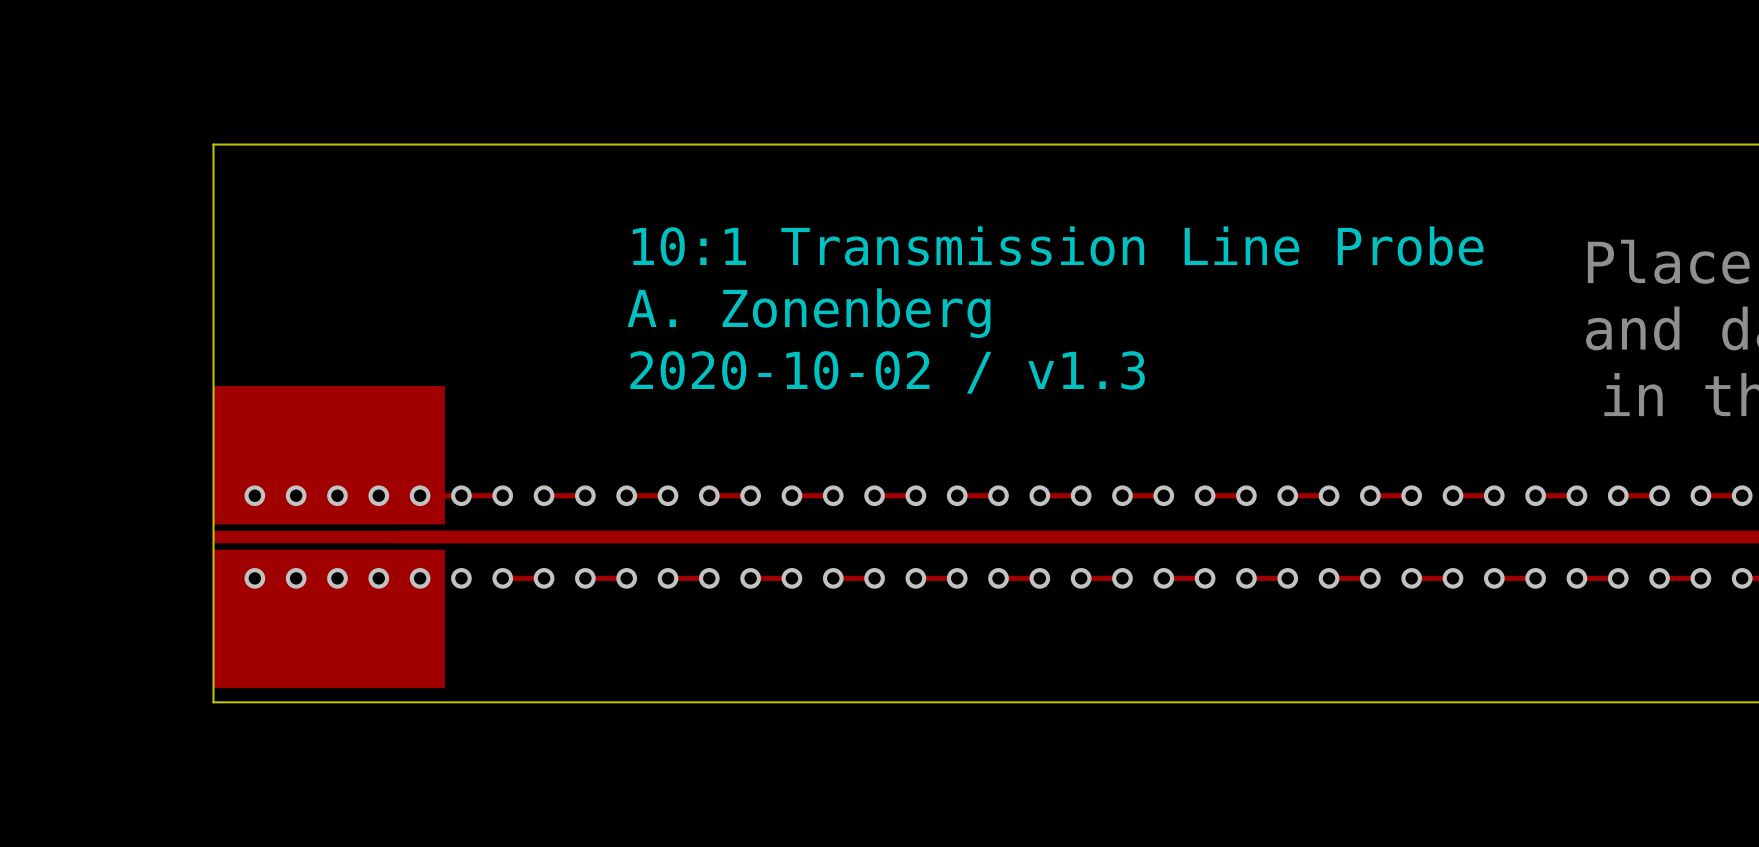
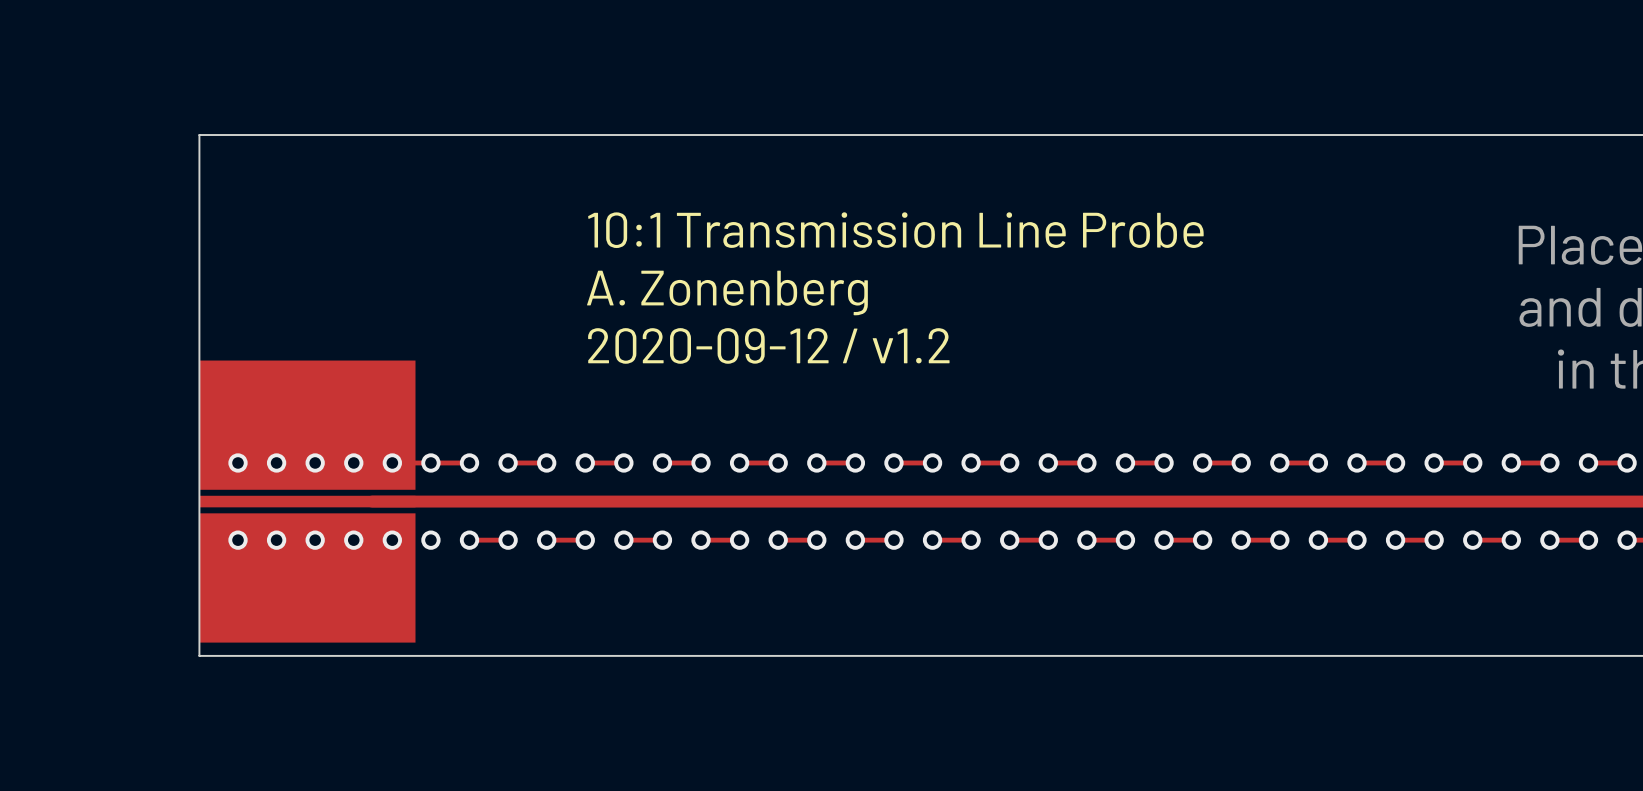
text: 2020-10-02 / v1.3 (887, 372) -> 2020-09-12 / v1.2 (768, 345)

